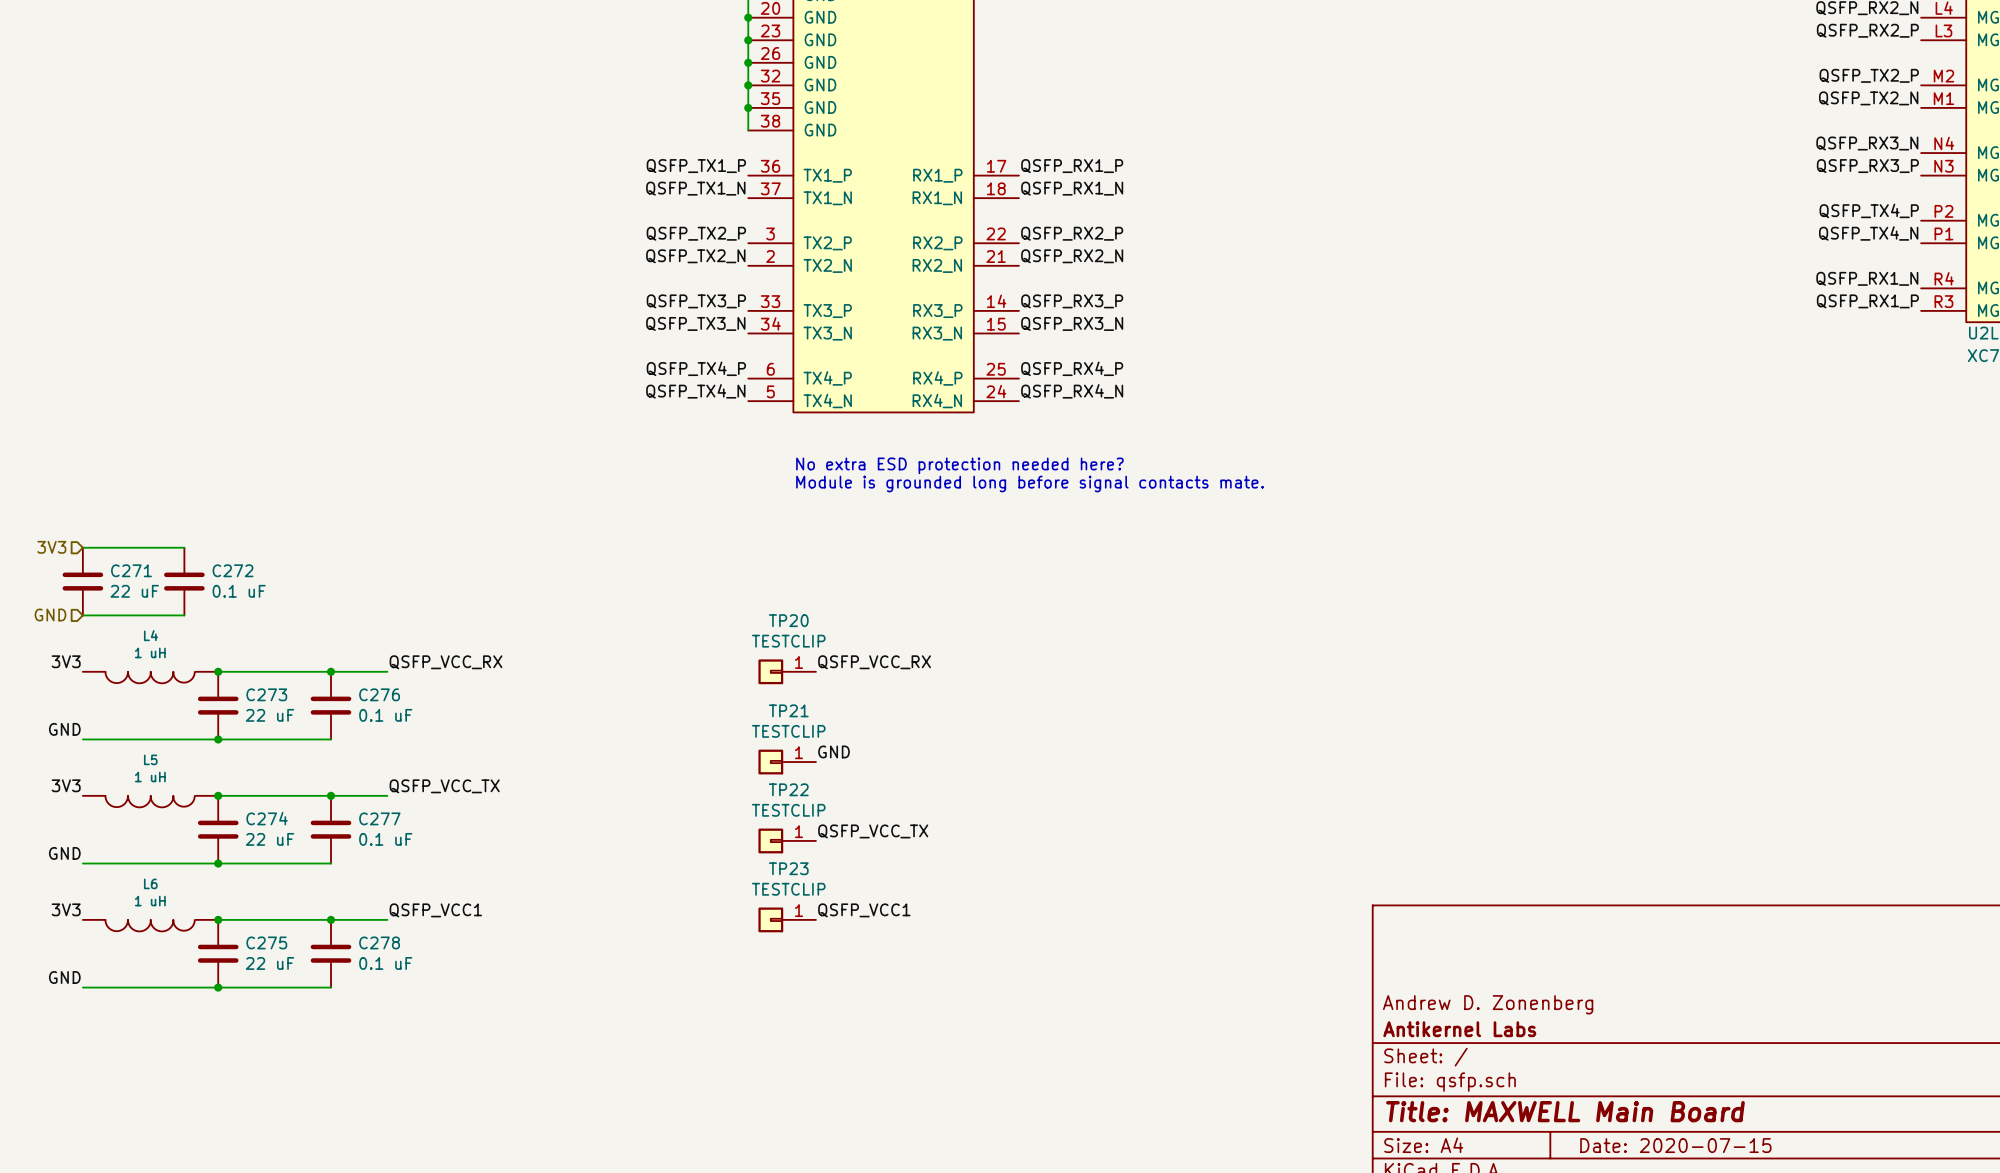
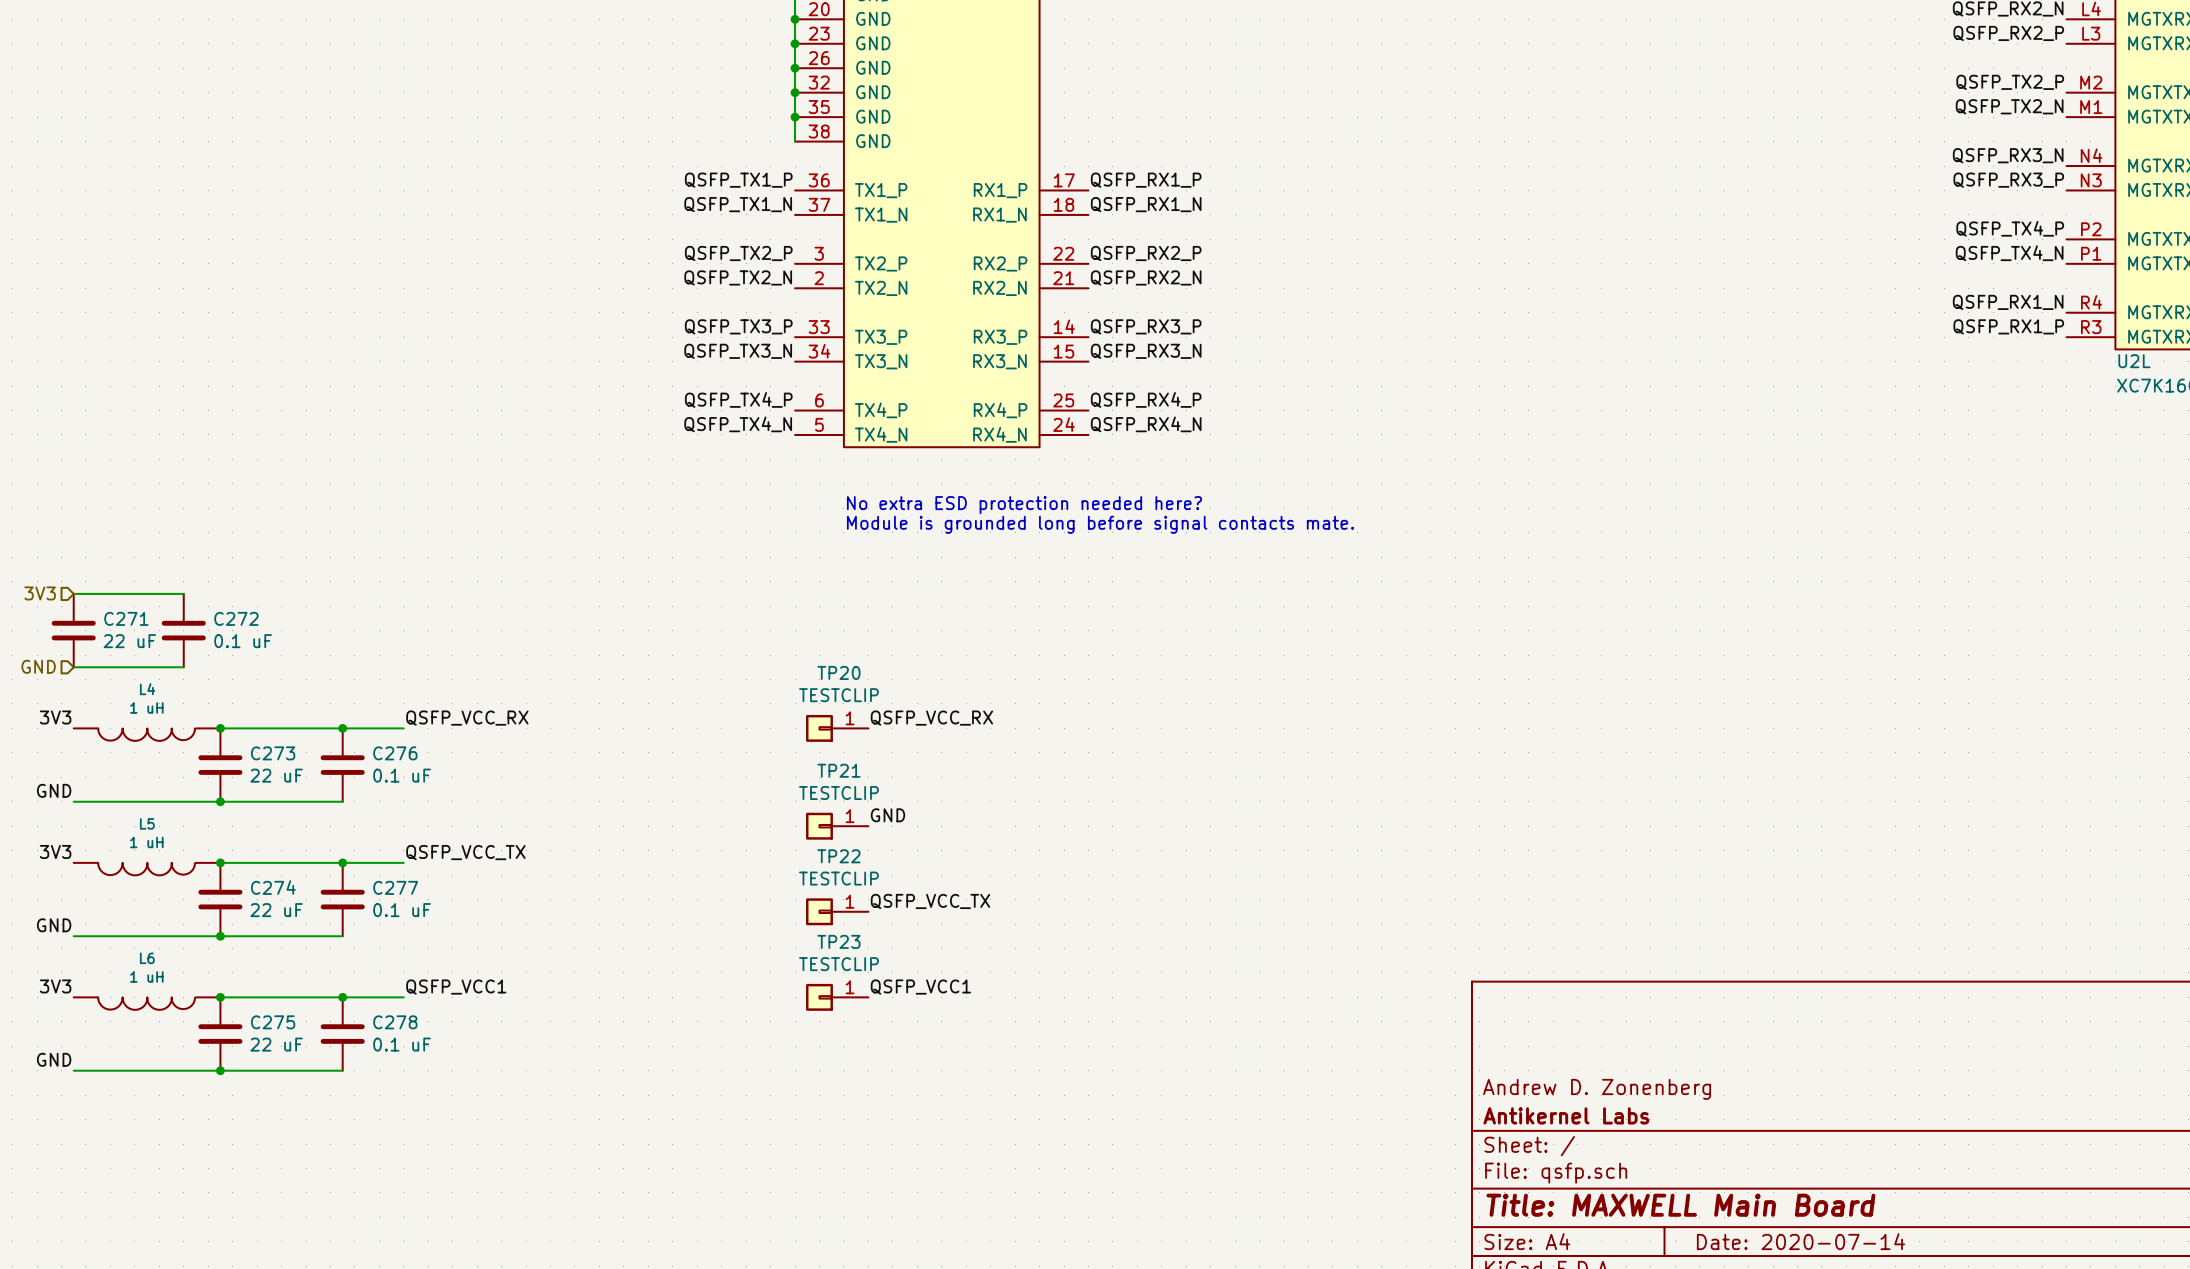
title block: Date: 2020-07-15 (1675, 1145) -> Date: 2020-07-14 (1800, 1241)

